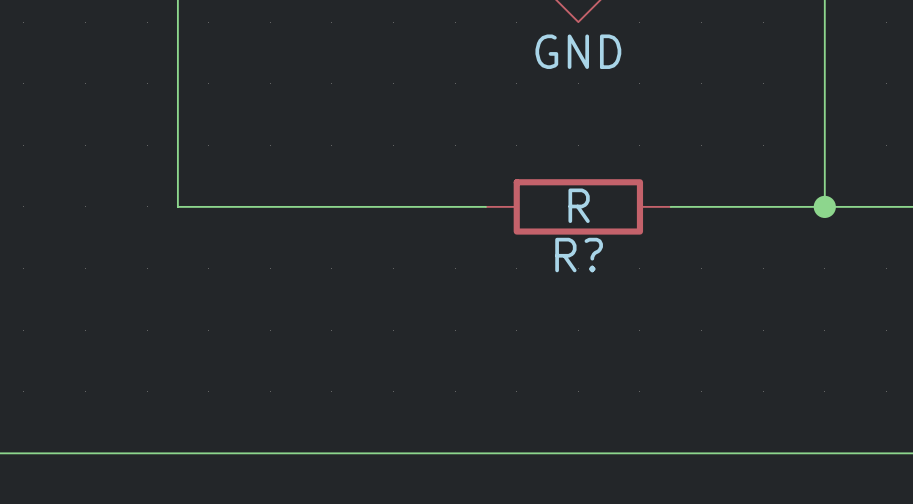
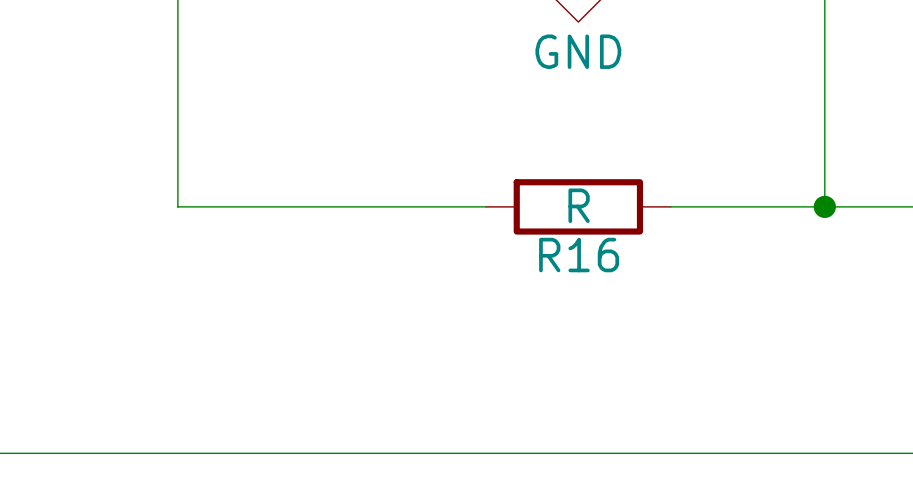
R? name: R? (579, 255) -> R16 (579, 255)

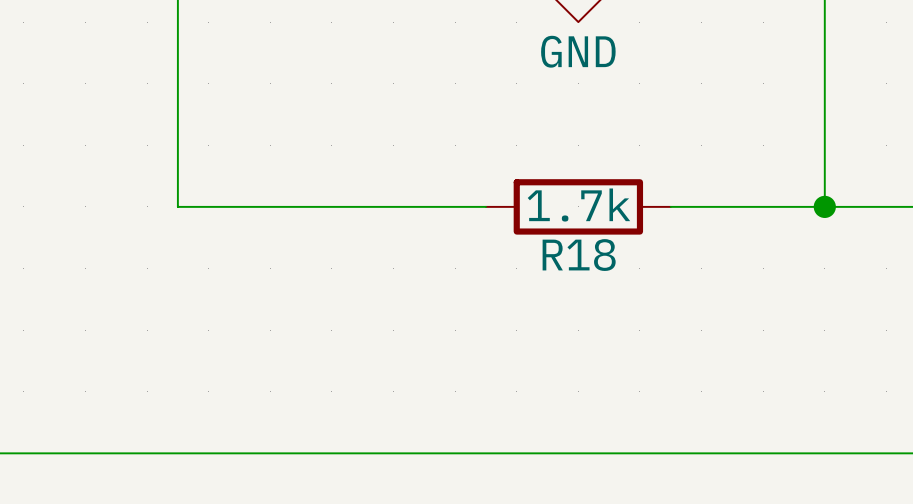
R16 value: R (579, 205) -> 1.7k (578, 205)
R16 name: R16 (579, 255) -> R18 (579, 255)

